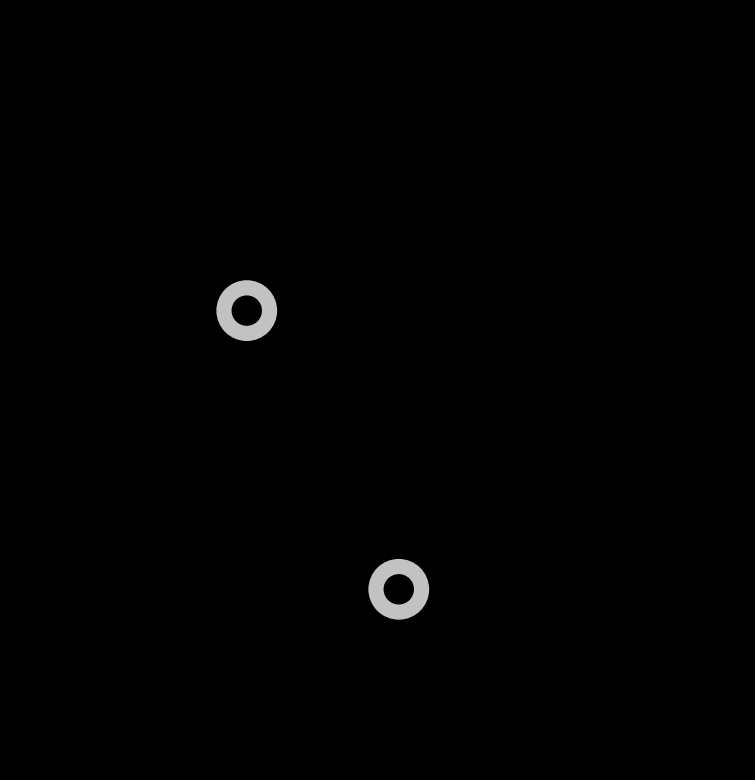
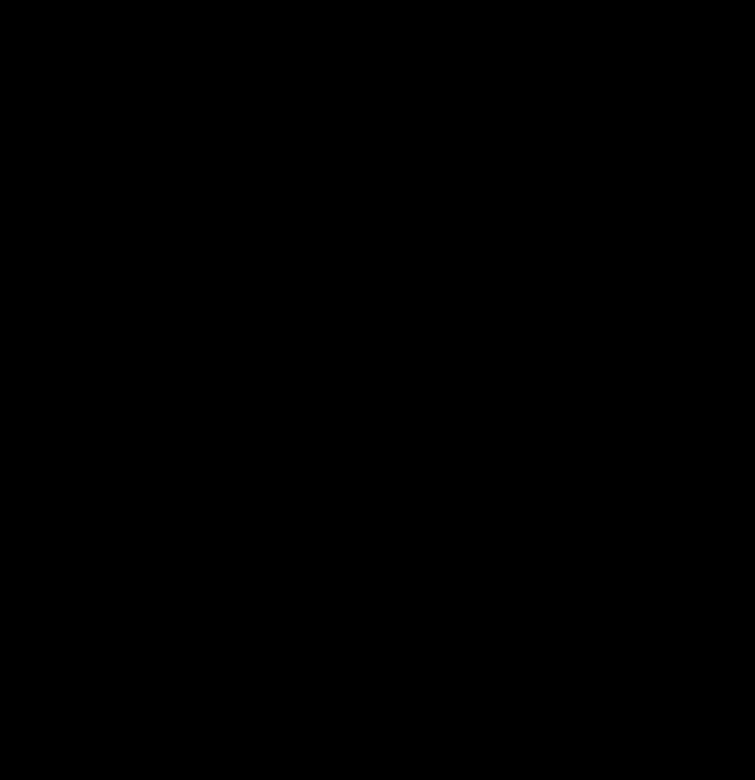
via: (246, 310) -> none
via: (398, 589) -> none

